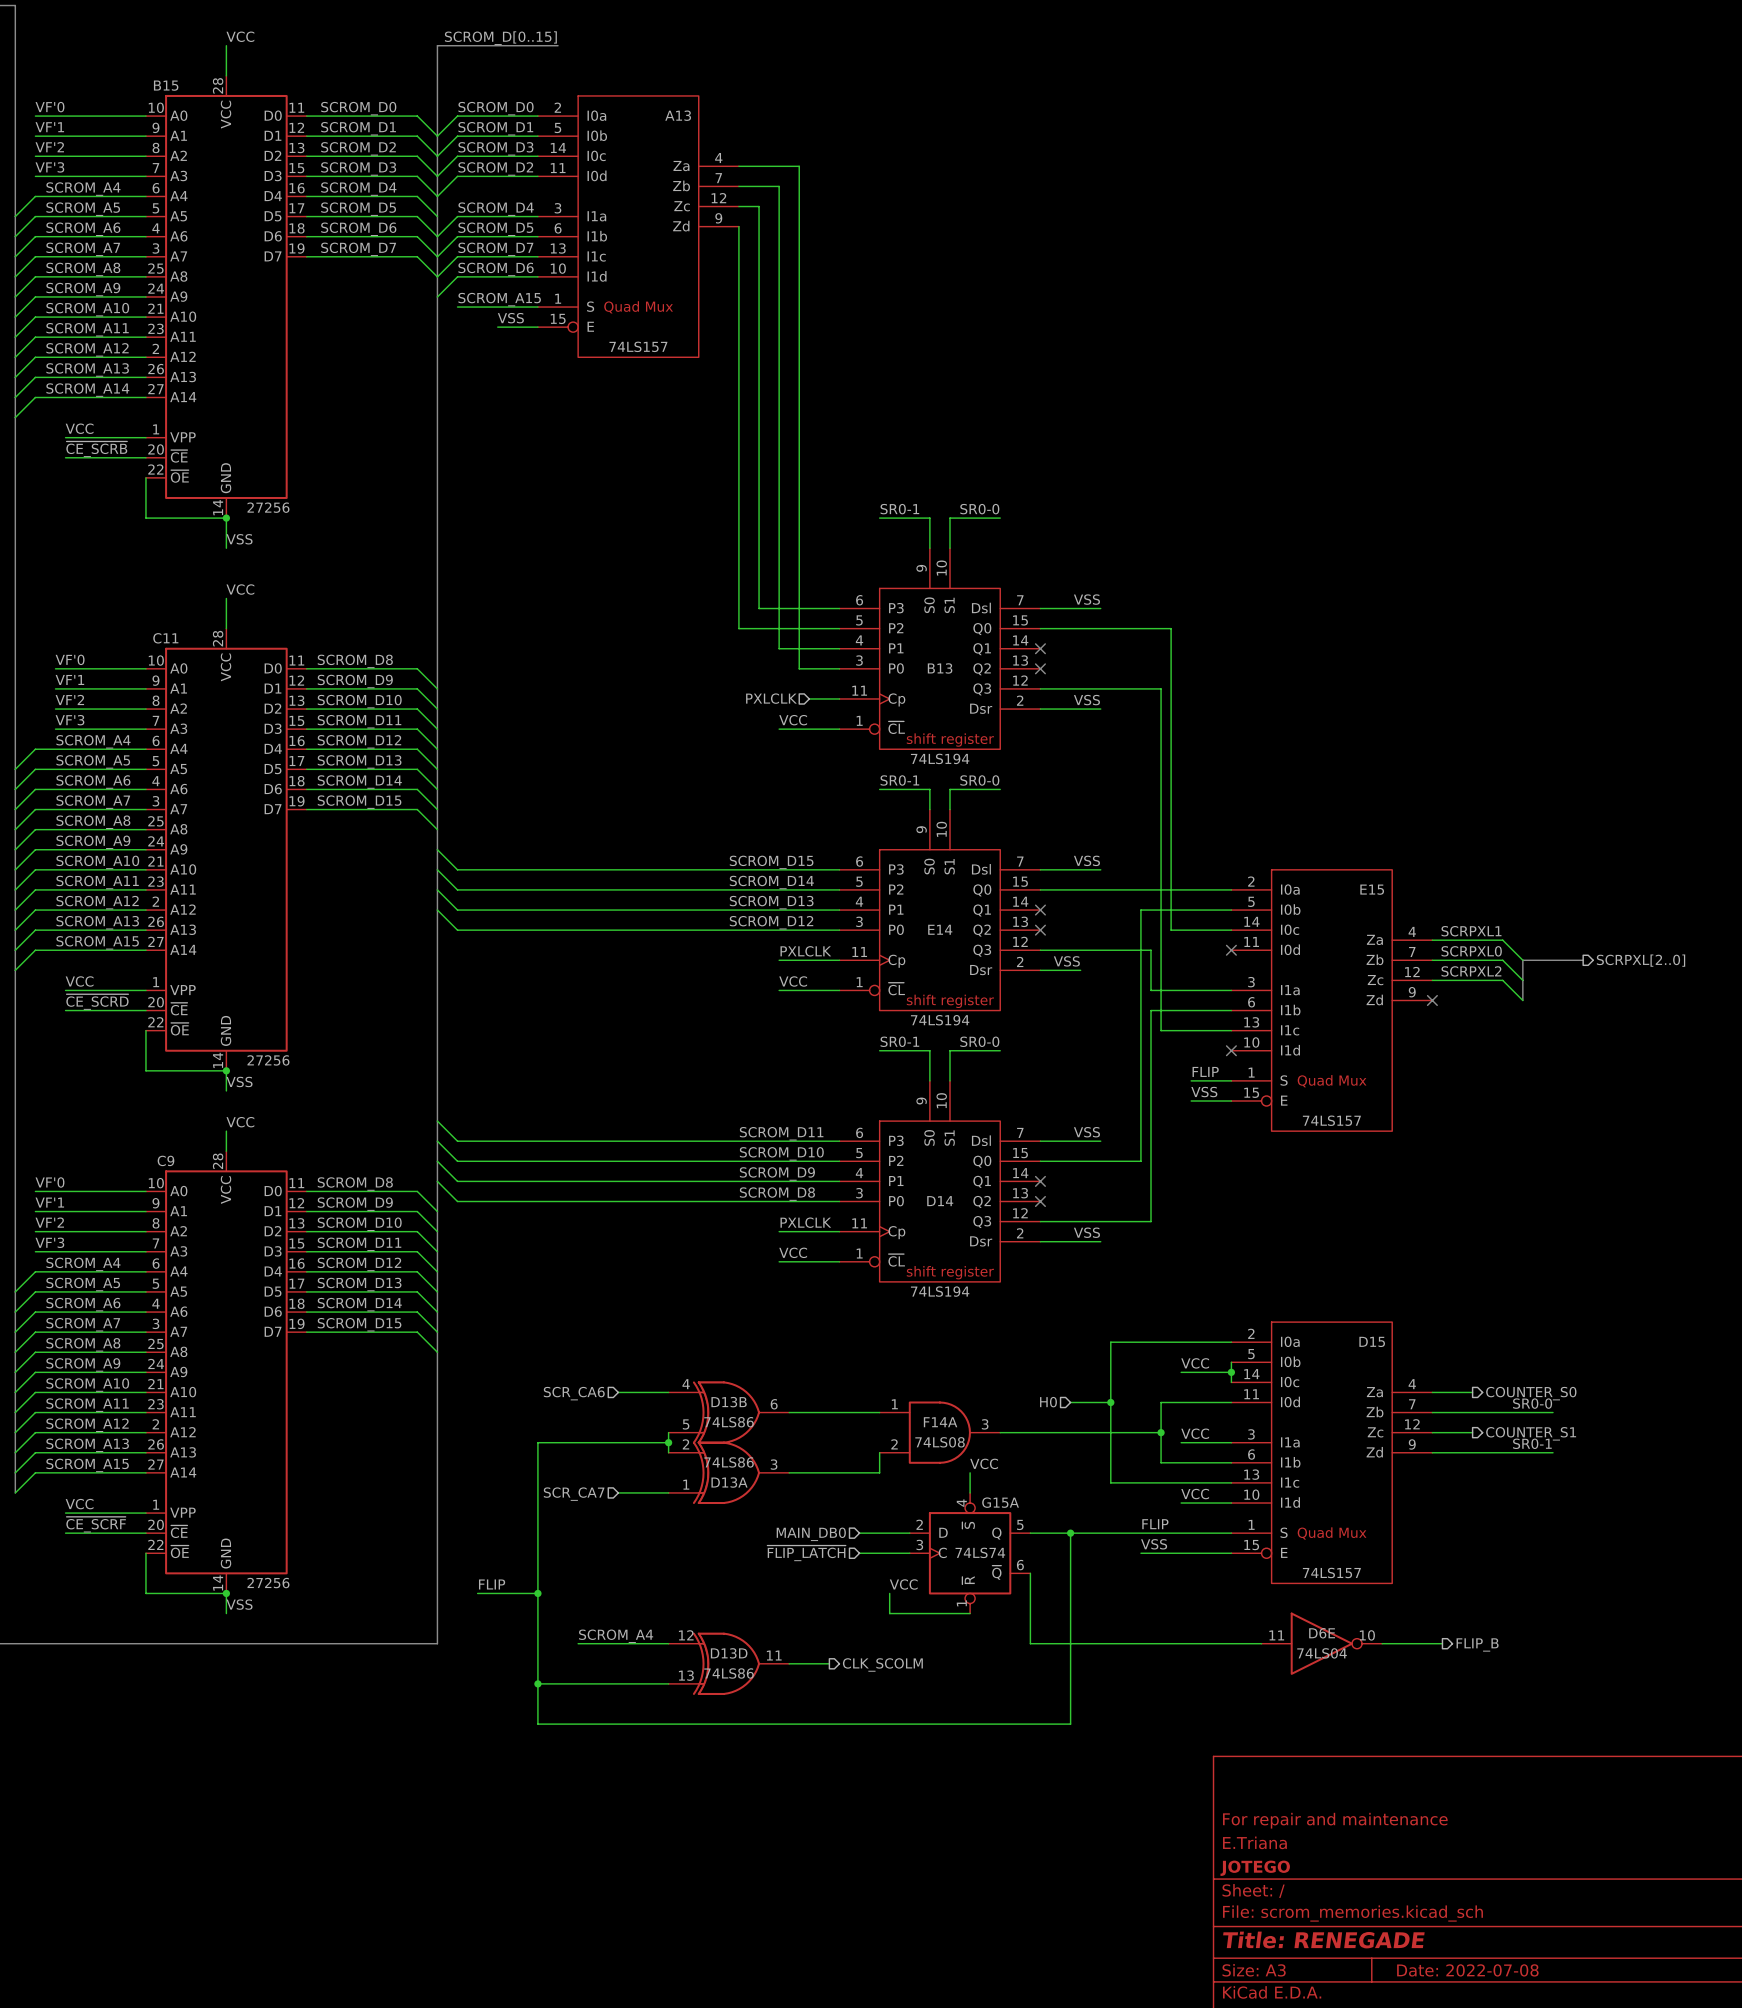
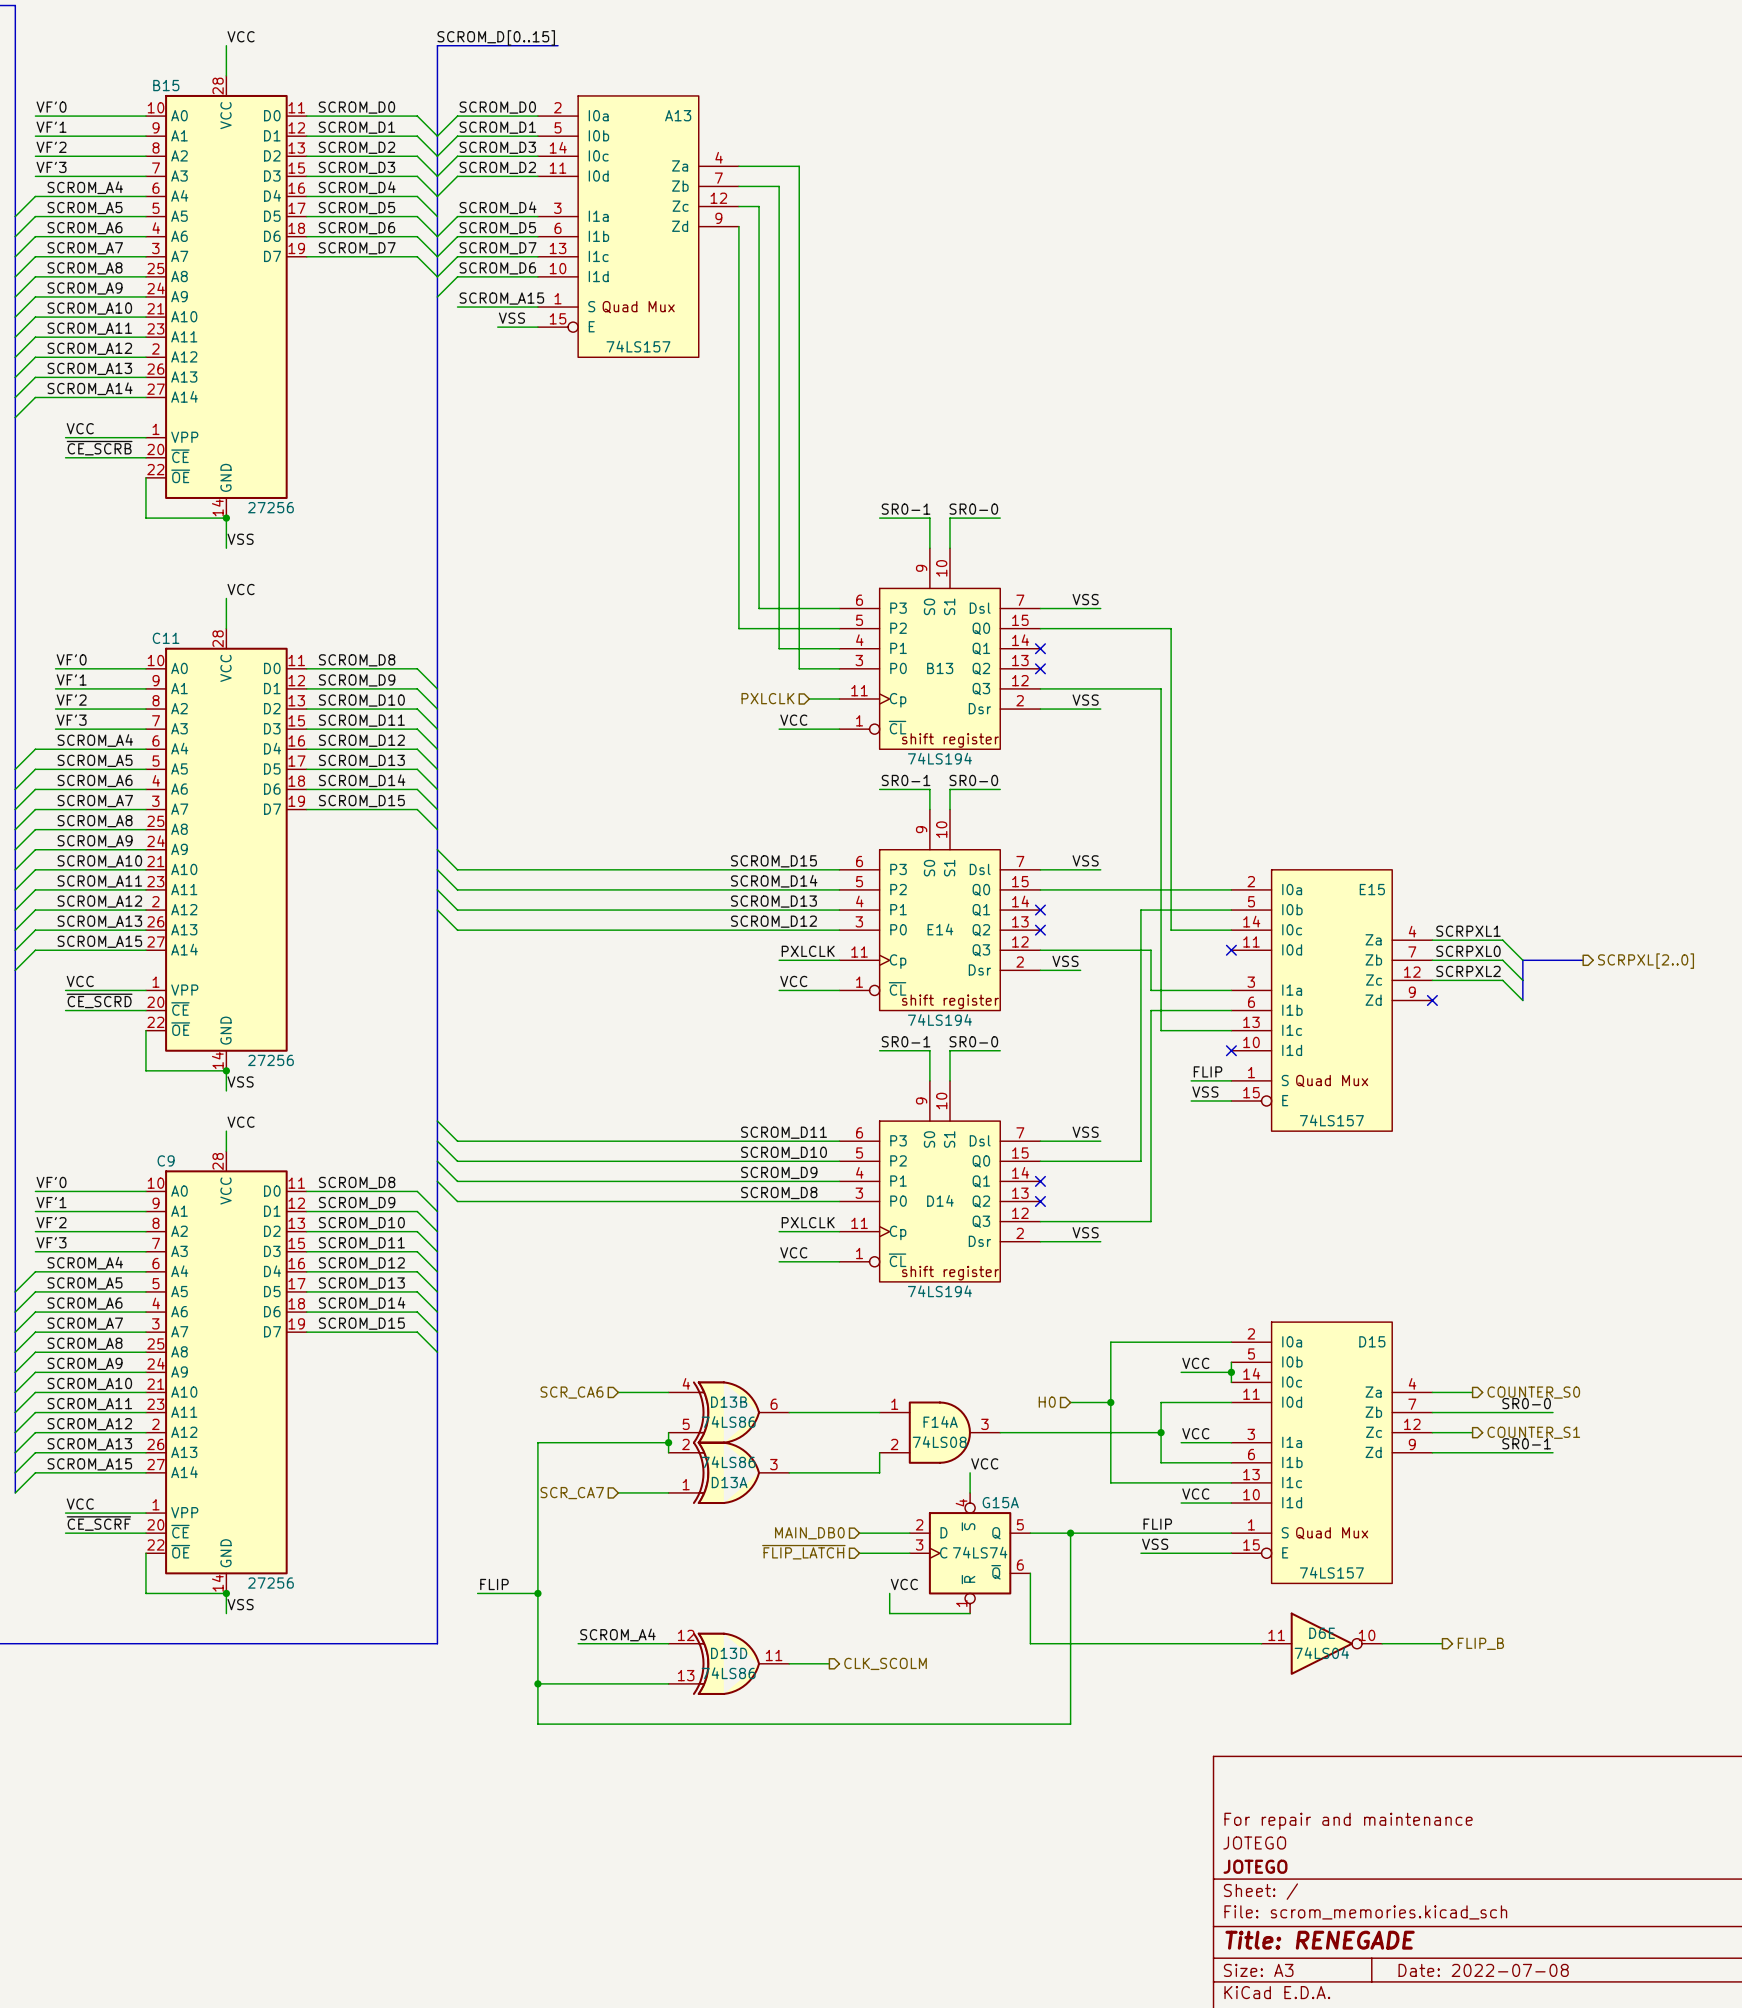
title block: E.Triana (1254, 1842) -> JOTEGO (1254, 1843)

